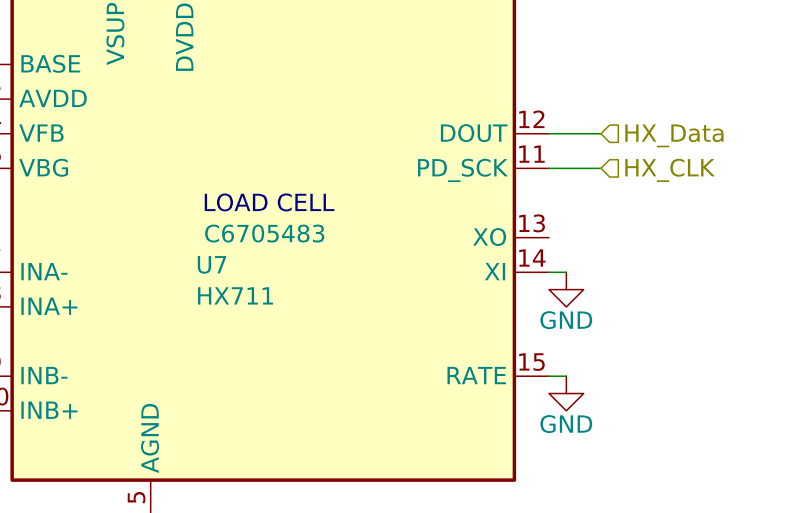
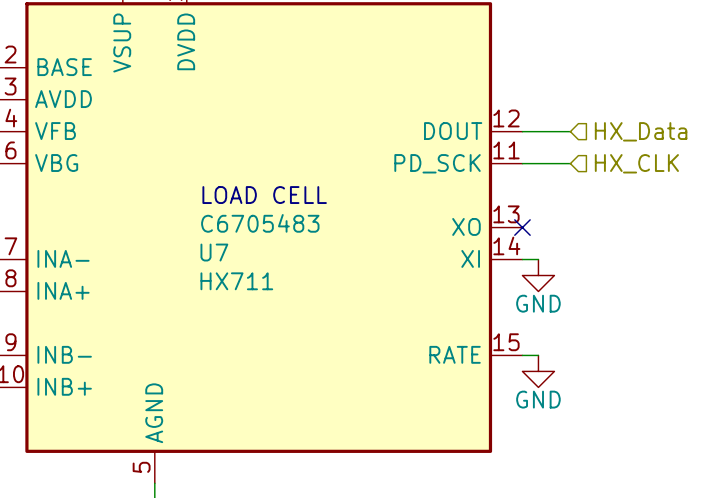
no-connect mark: none -> (522, 227)

